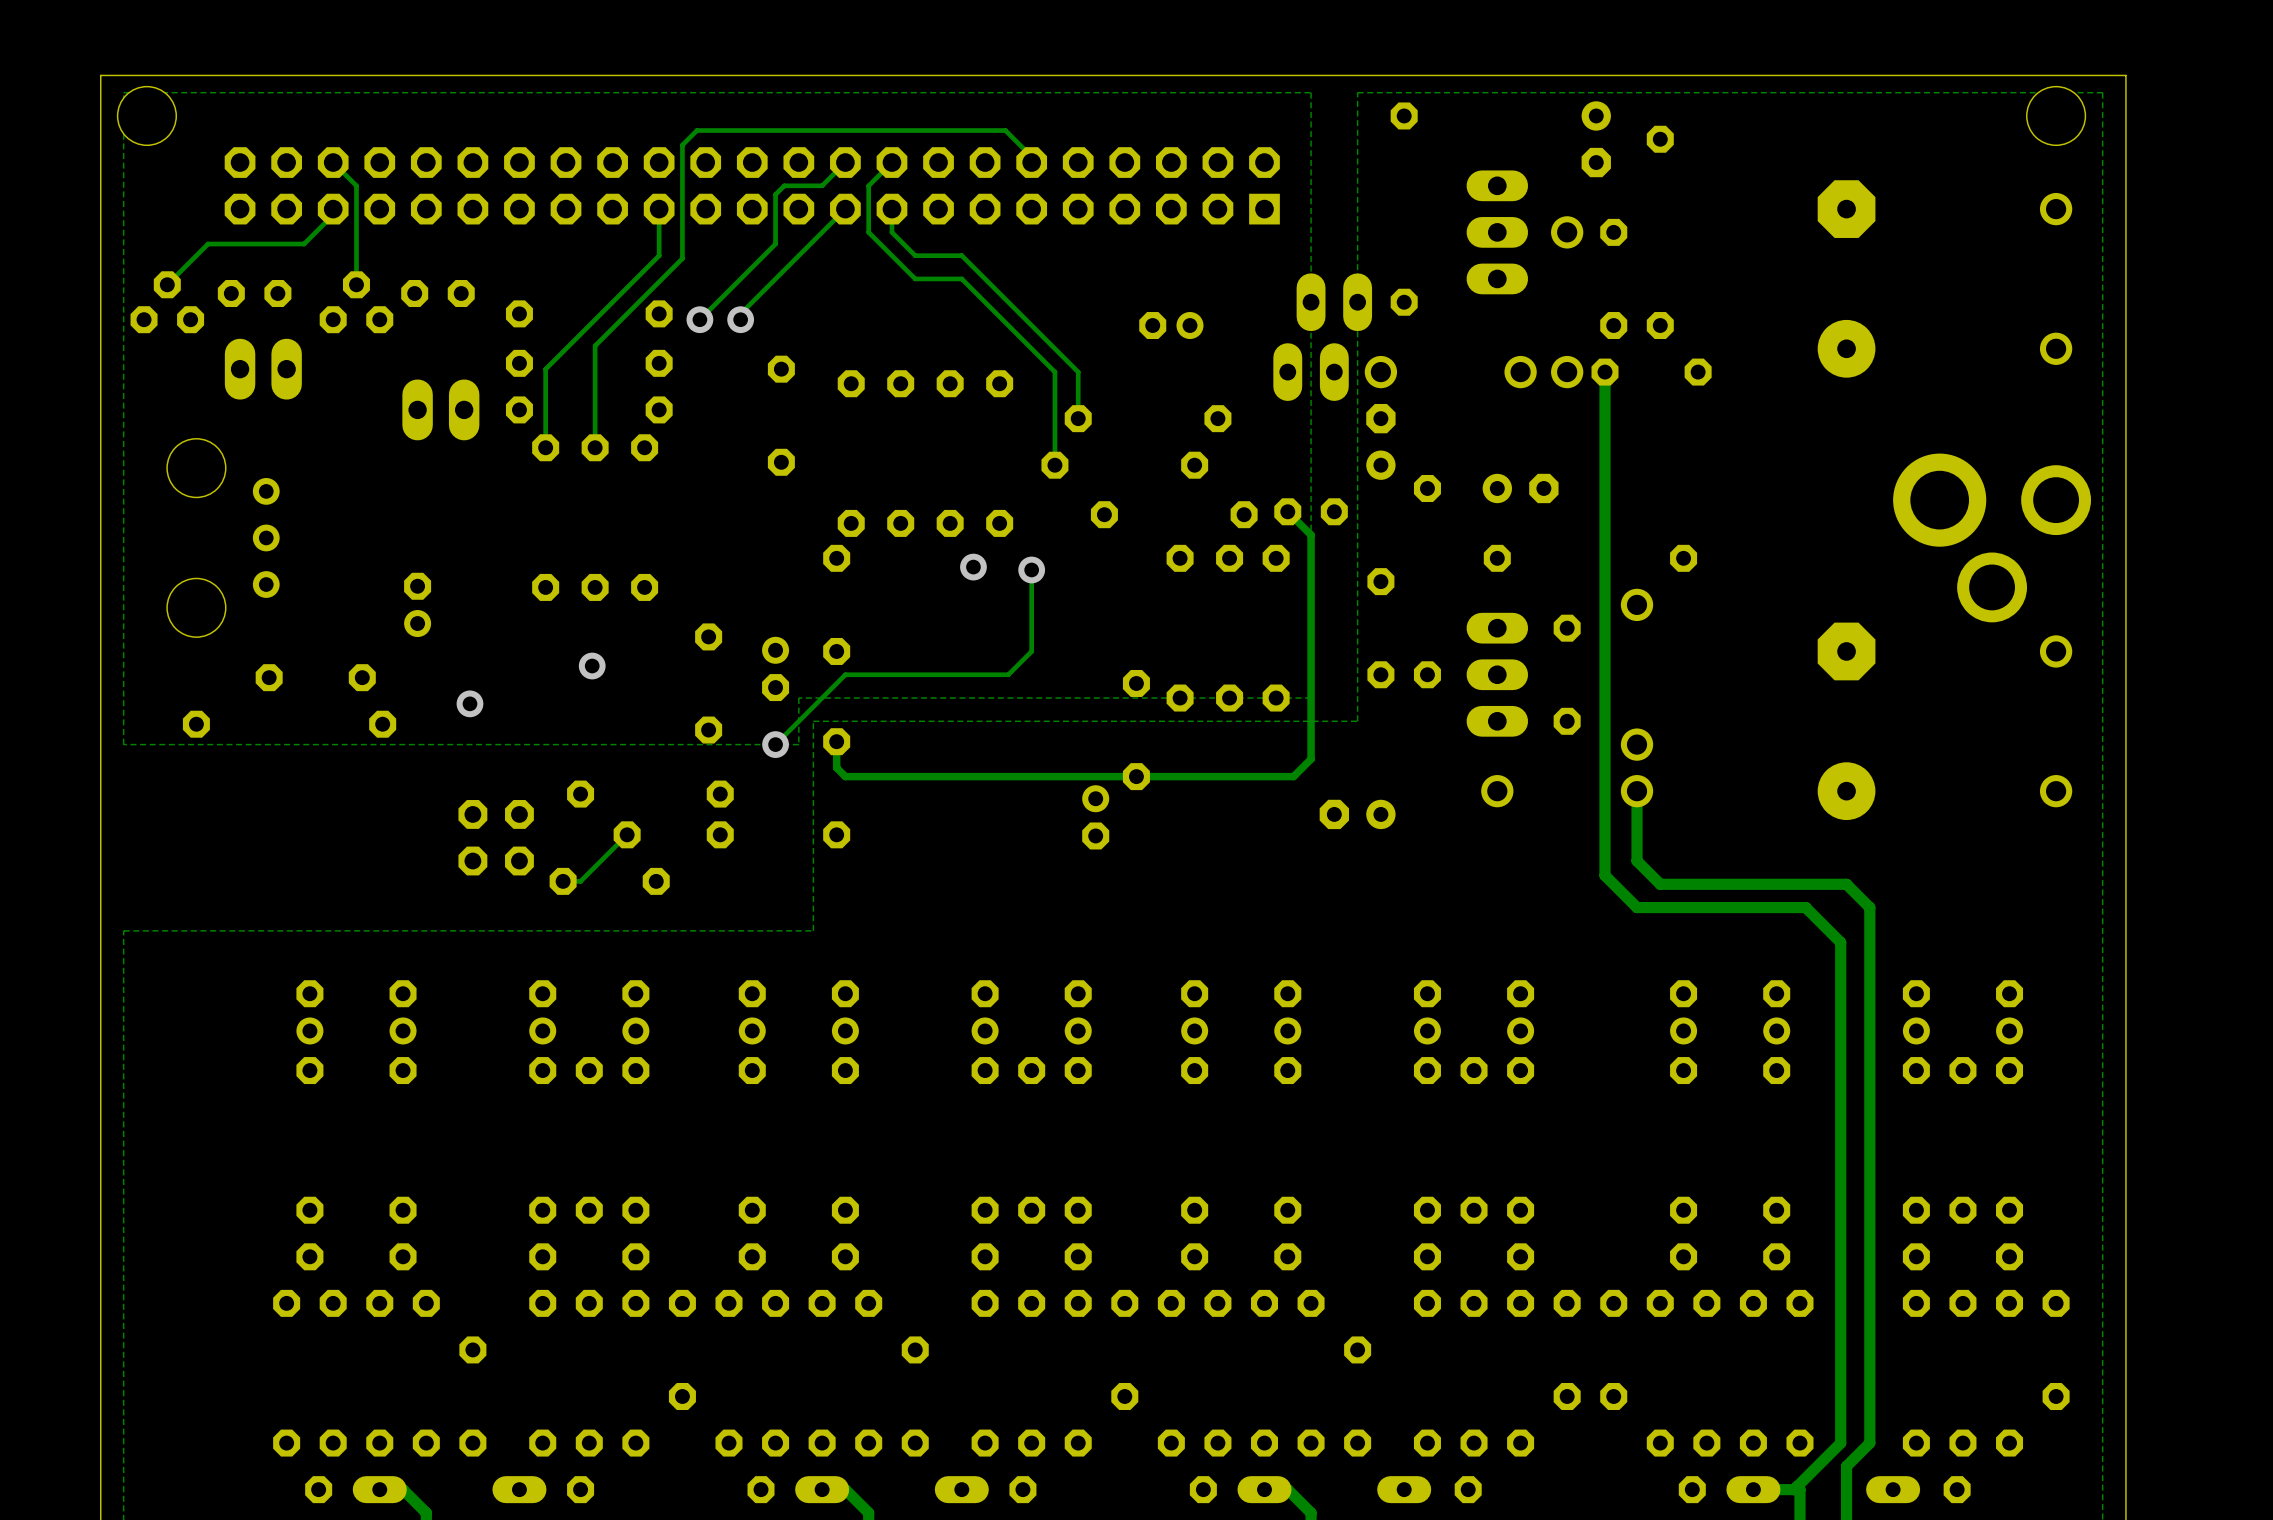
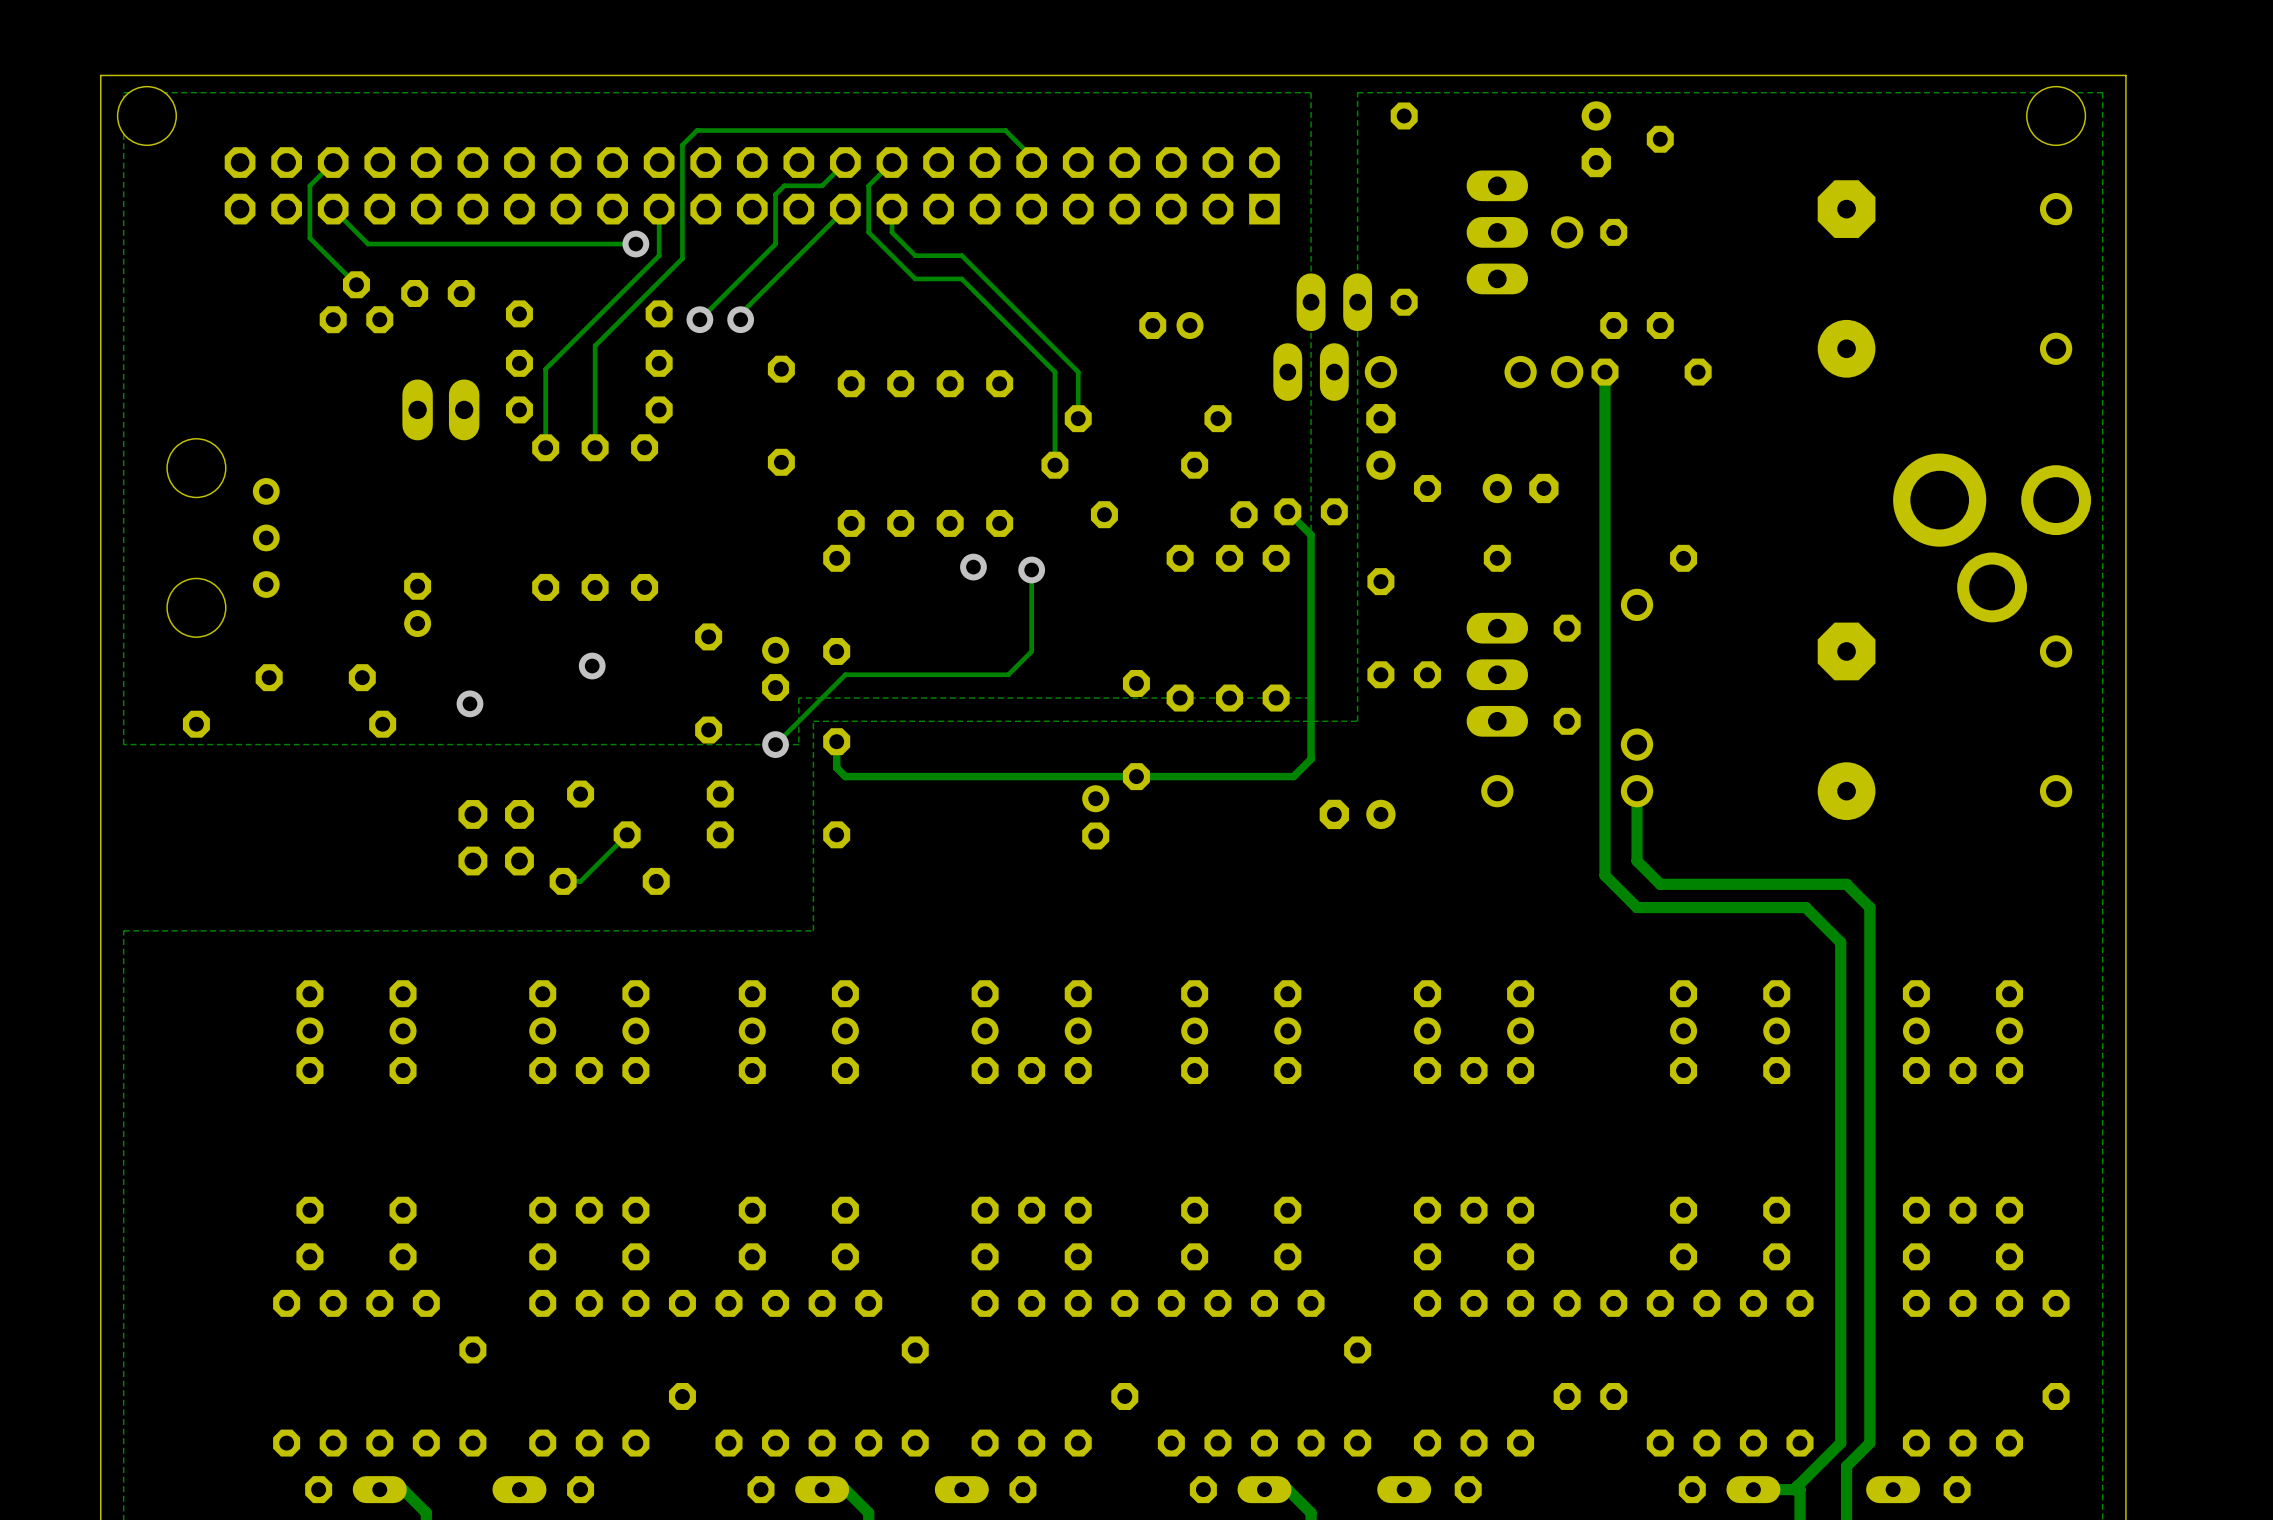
track: (333, 162) (356, 185) (356, 284) -> (333, 162) (309, 185) (309, 238) (356, 284)
track: (333, 209) (333, 214) (304, 244) (208, 244) (167, 284) -> (333, 209) (368, 244) (635, 244)
via: none -> (635, 244)
part: (254, 293) -> none
part: (167, 302) -> none
part: (263, 369) -> none

